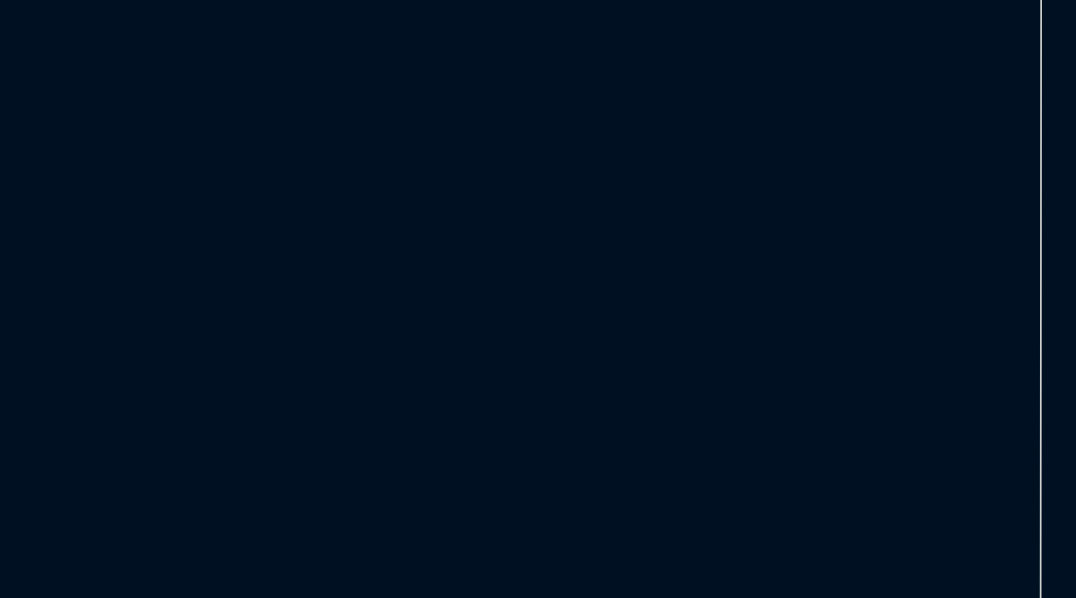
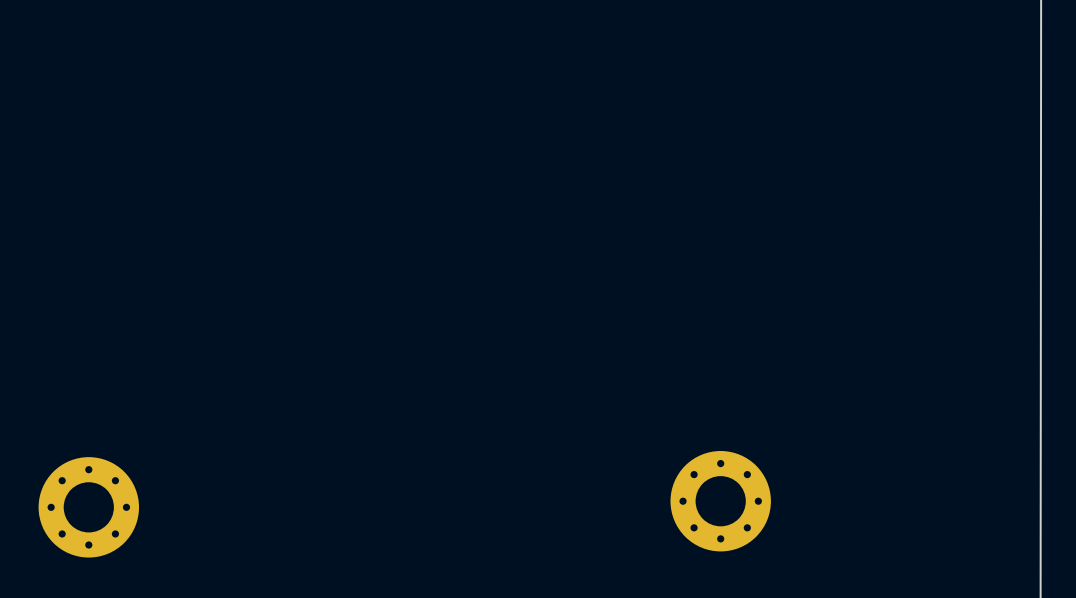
part: none -> (720, 501)
part: none -> (88, 507)

